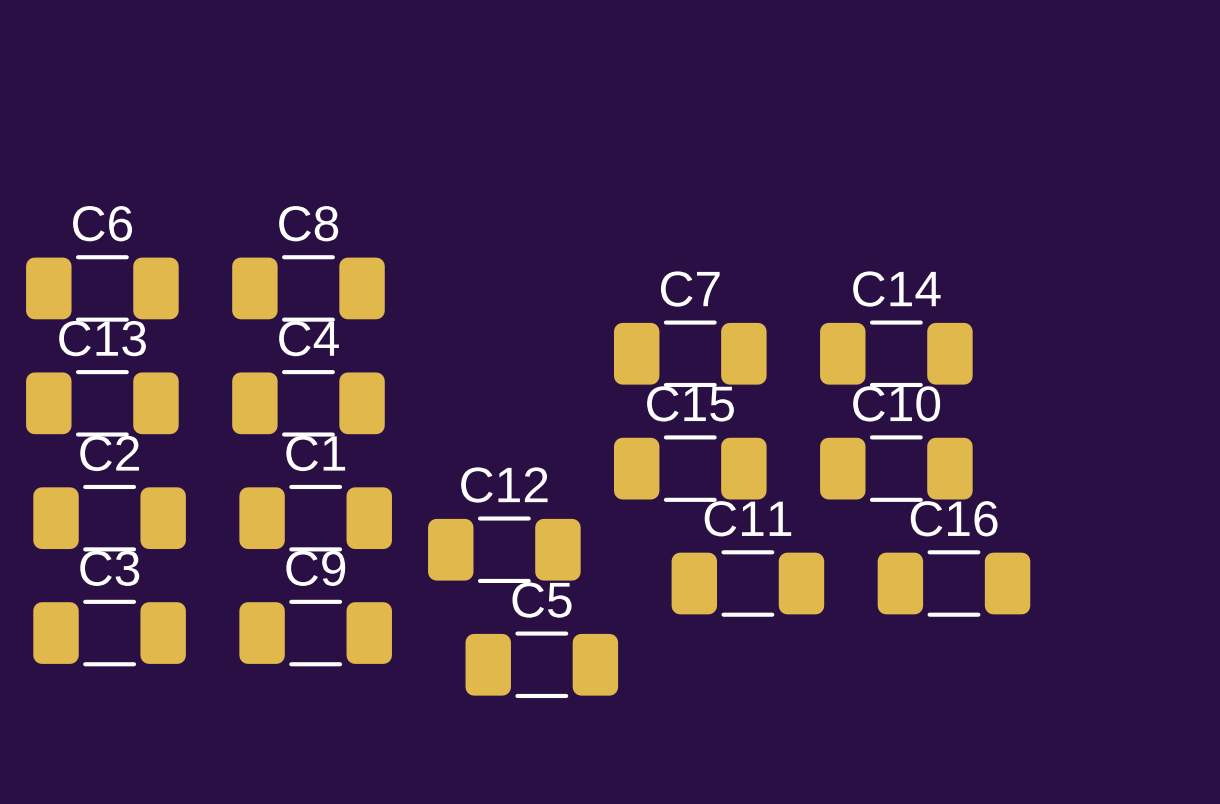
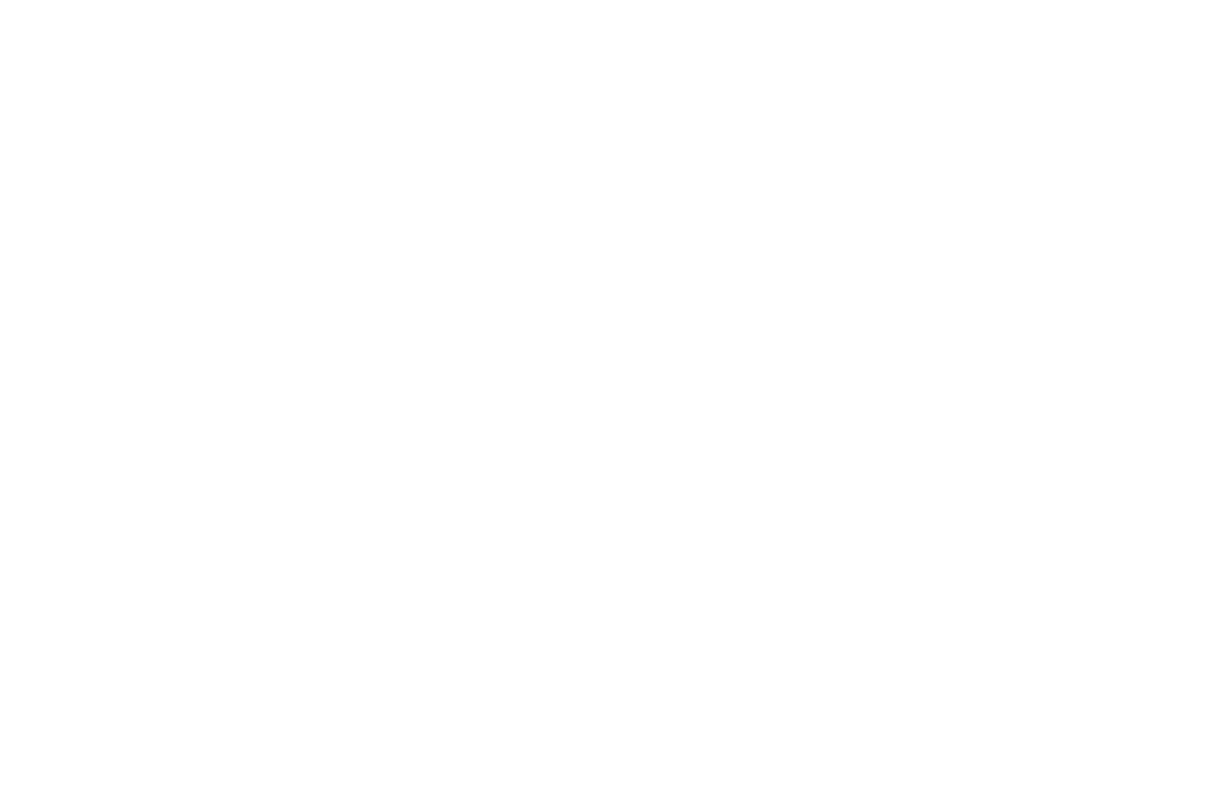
C6: (102, 288) -> none
C8: (308, 288) -> none
C7: (690, 353) -> none
C14: (896, 353) -> none
C13: (102, 403) -> none
C4: (308, 403) -> none
C15: (690, 468) -> none
C10: (896, 468) -> none
C2: (109, 518) -> none
C1: (315, 518) -> none
C12: (504, 549) -> none
C11: (747, 583) -> none
C16: (953, 583) -> none
C3: (109, 633) -> none
C9: (315, 633) -> none
C5: (541, 664) -> none

